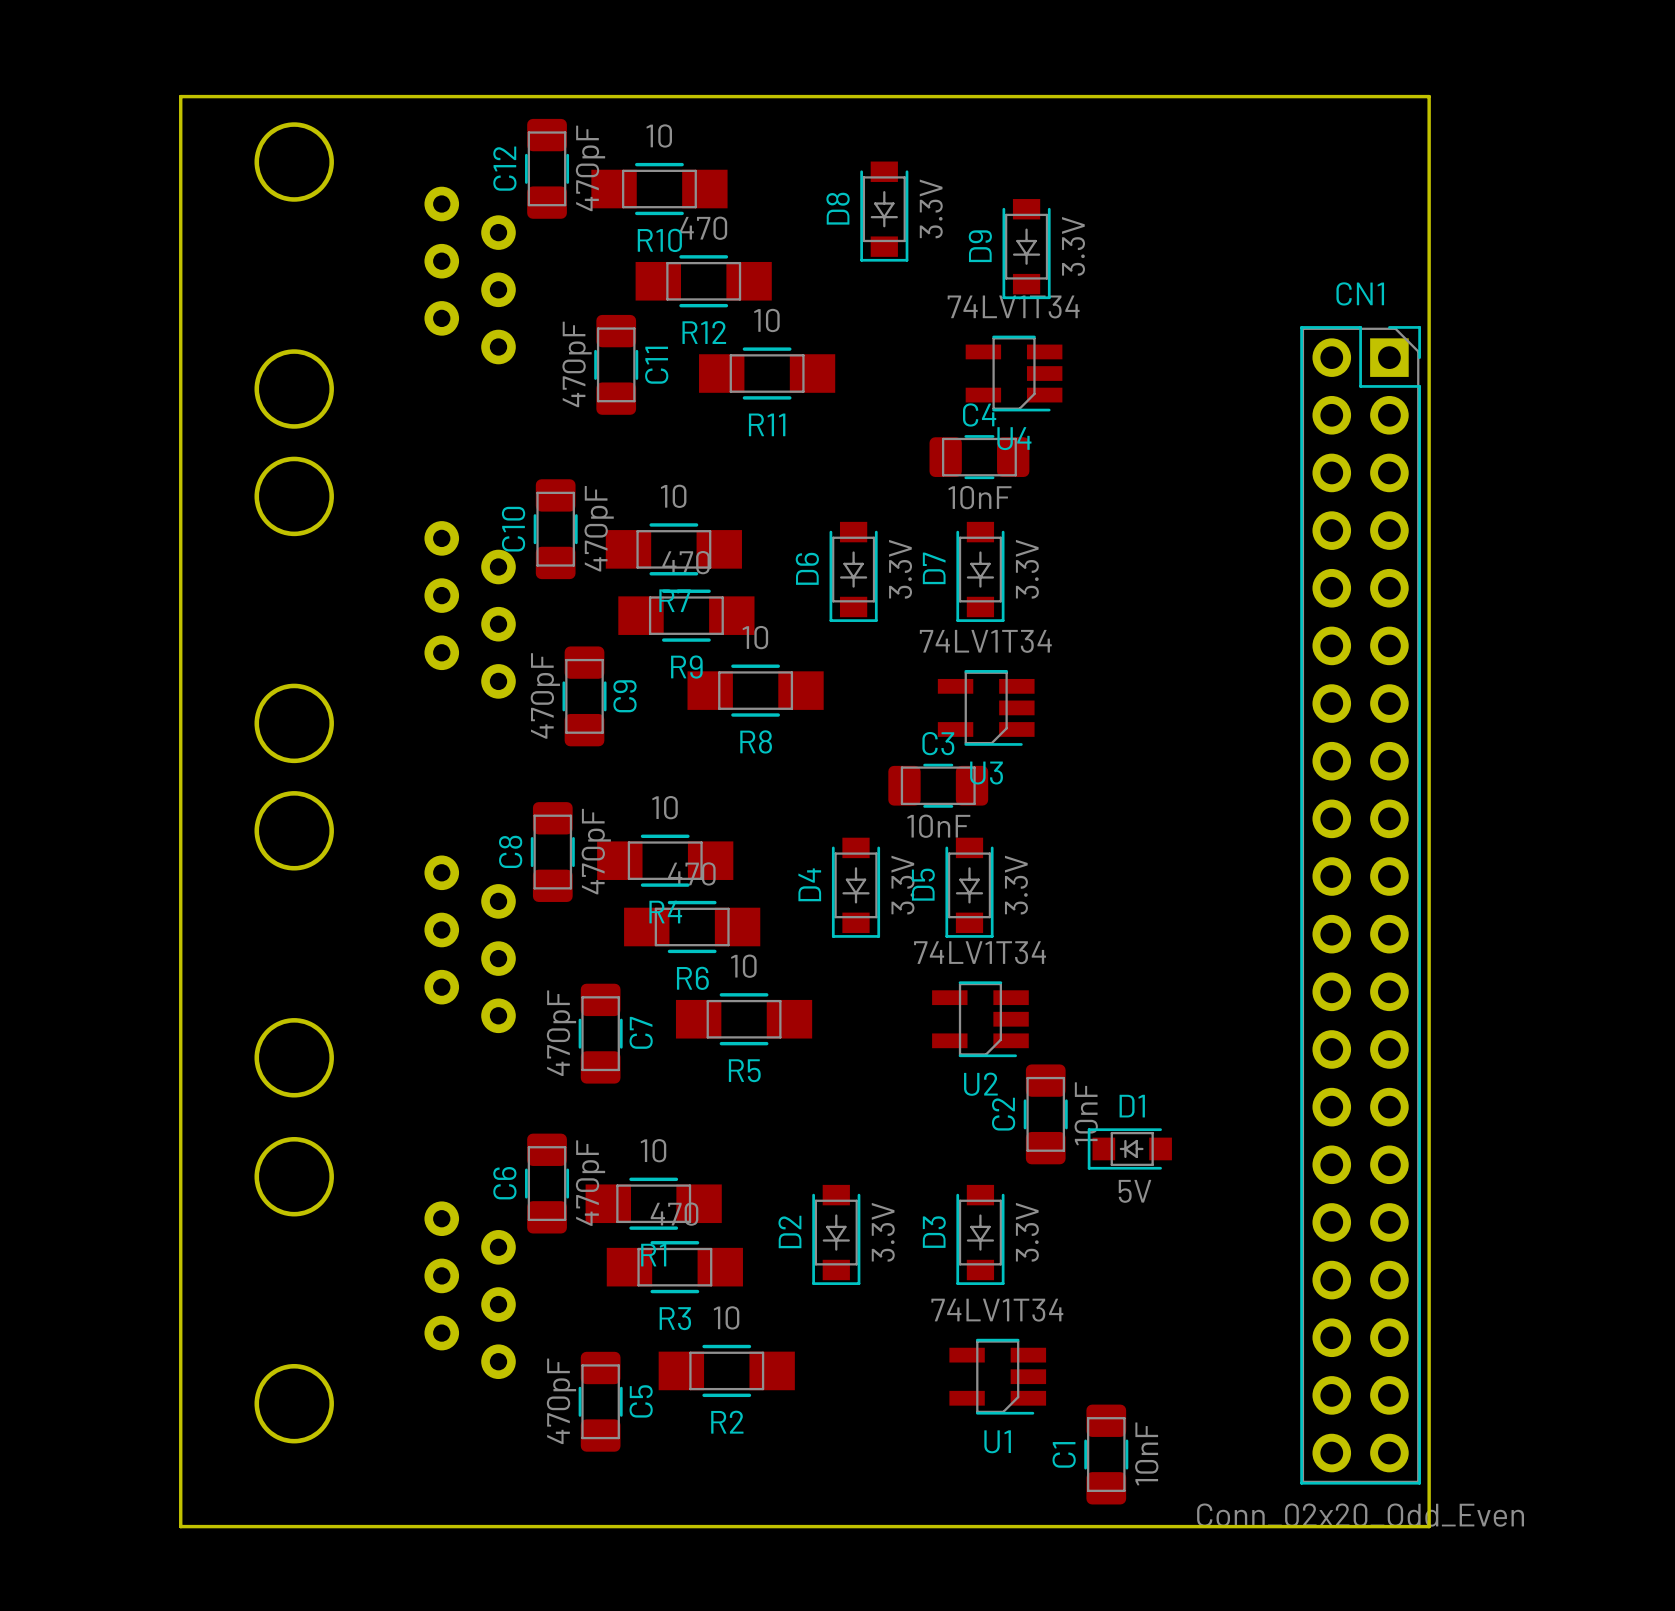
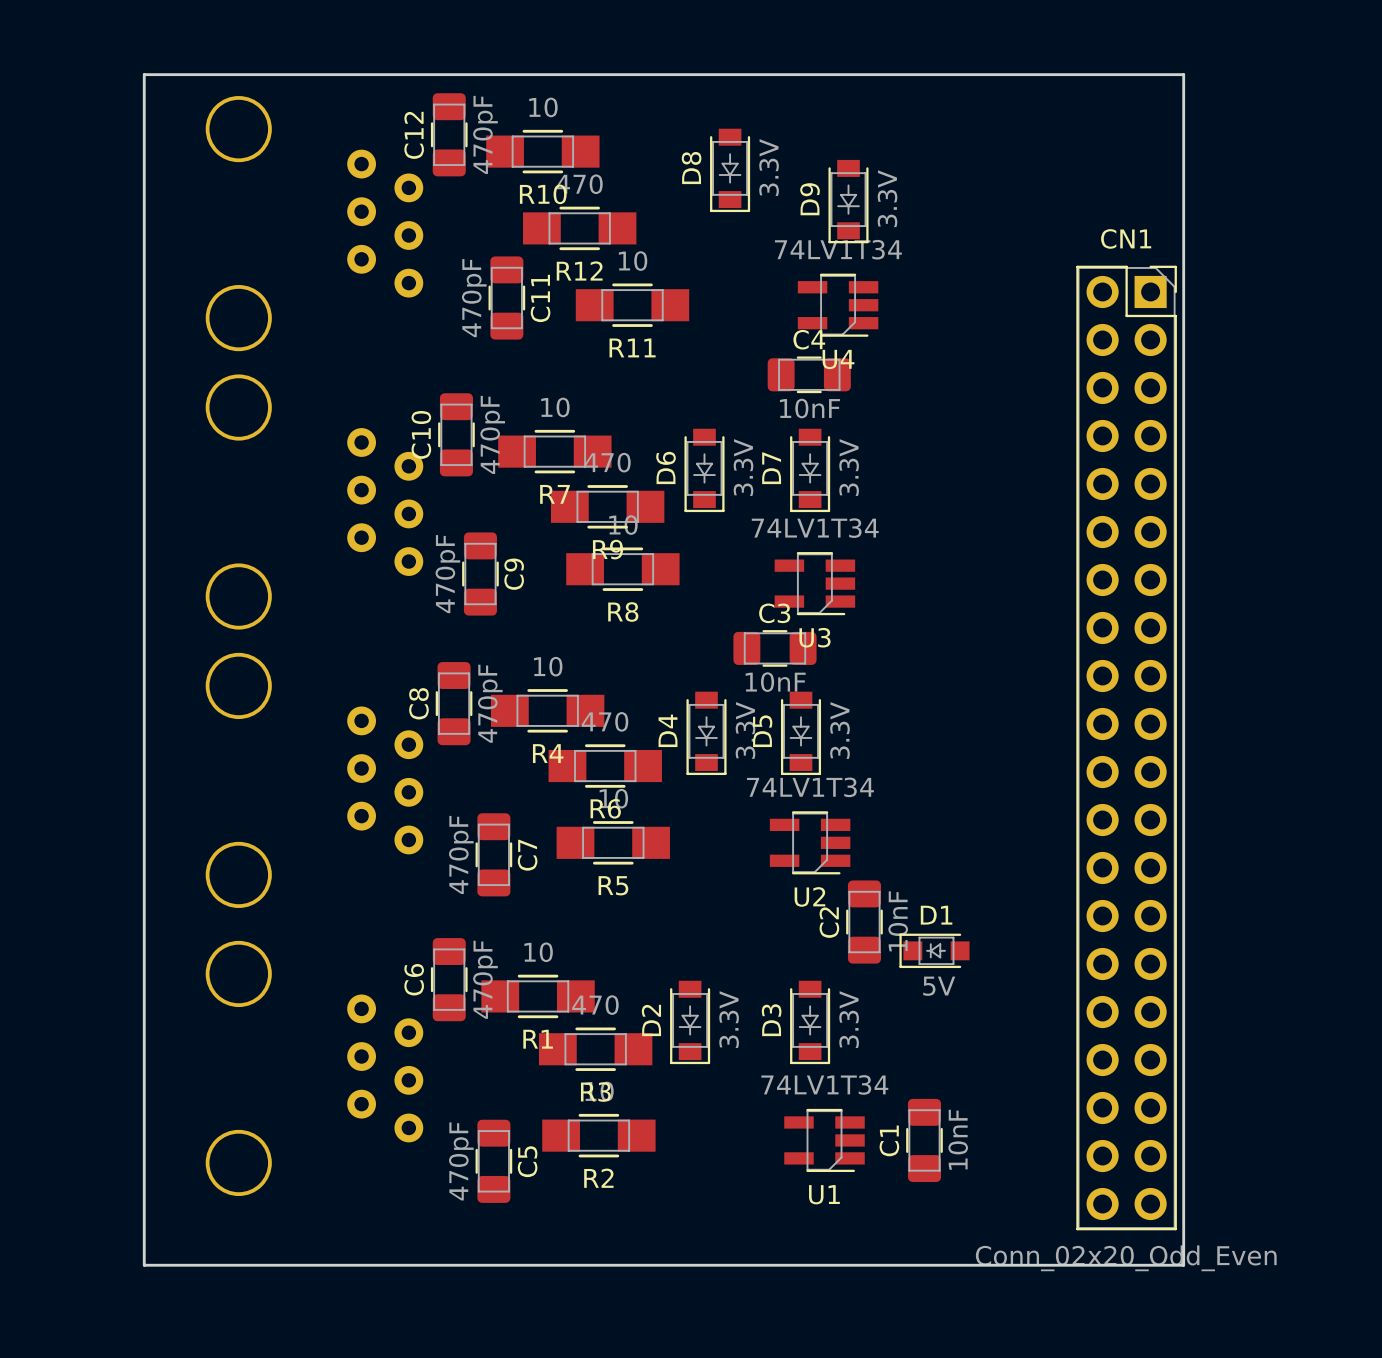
R9 position: (686, 615) -> (607, 506)
R6 position: (692, 926) -> (605, 766)
R3 position: (674, 1267) -> (595, 1049)
C1 position: (1106, 1454) -> (924, 1140)

